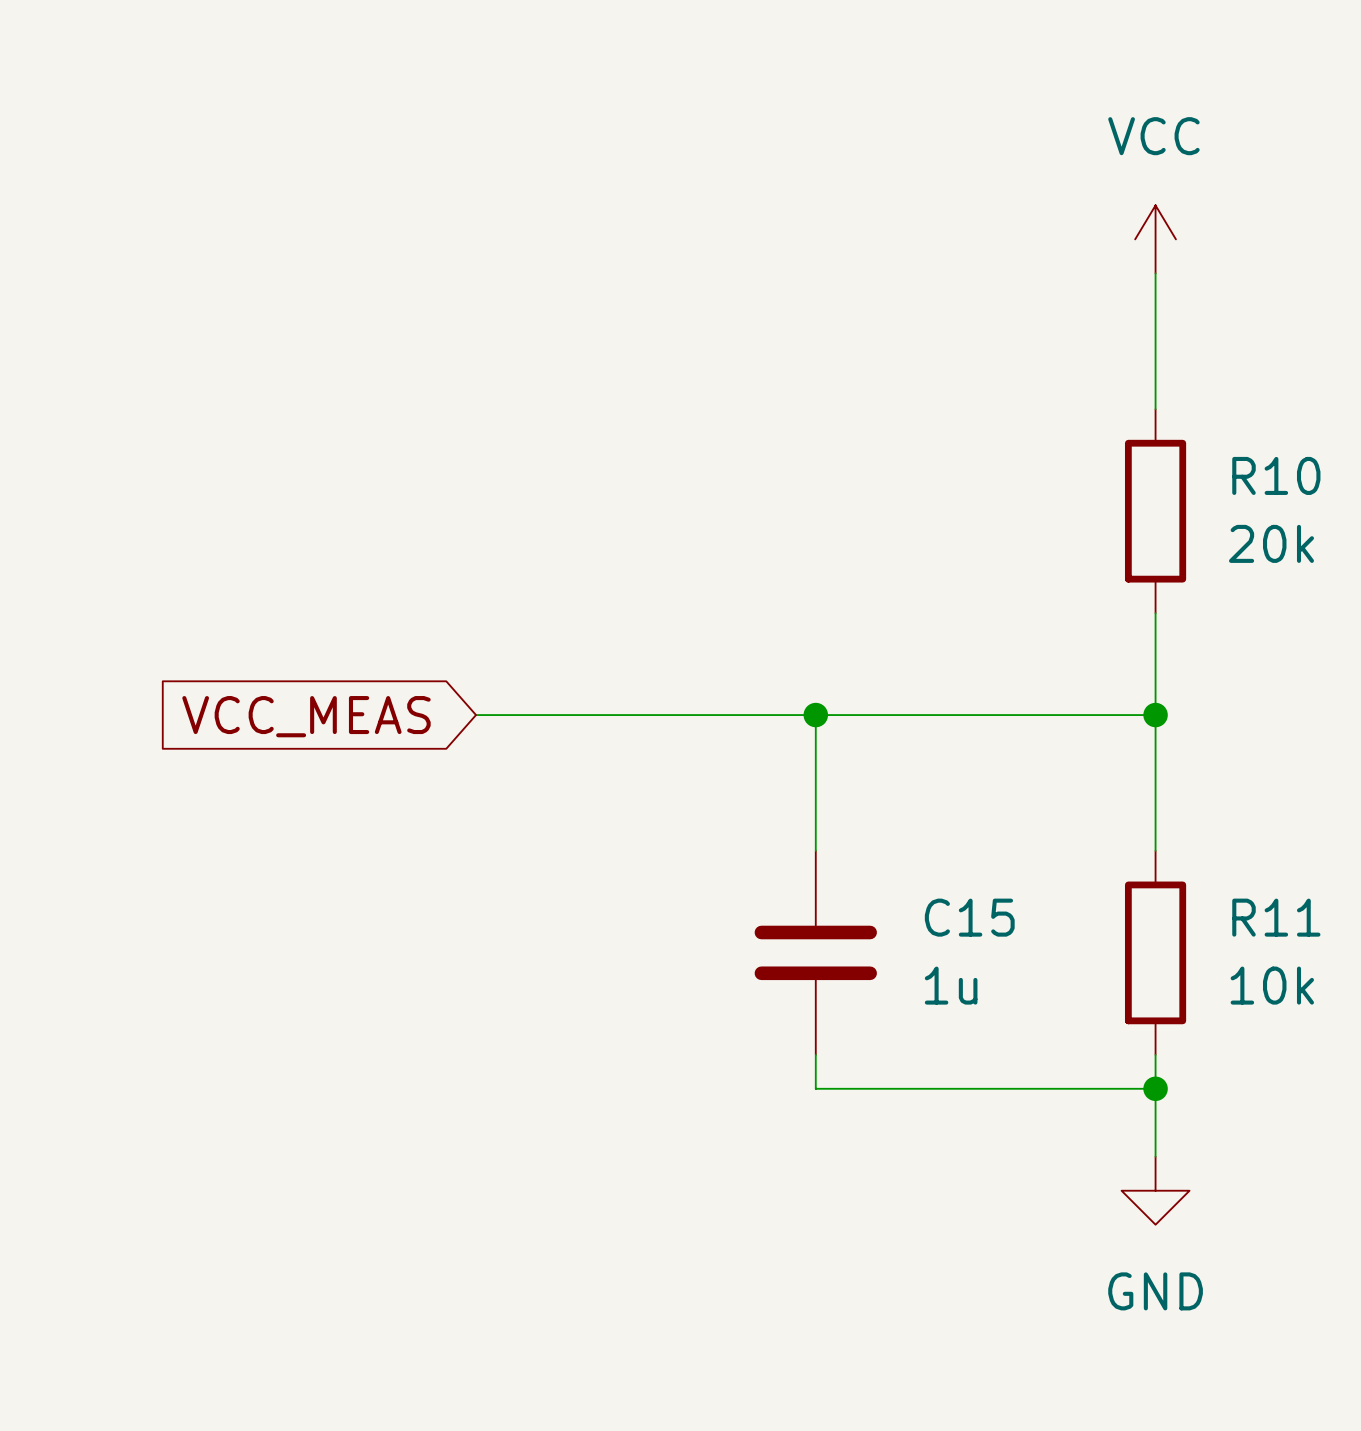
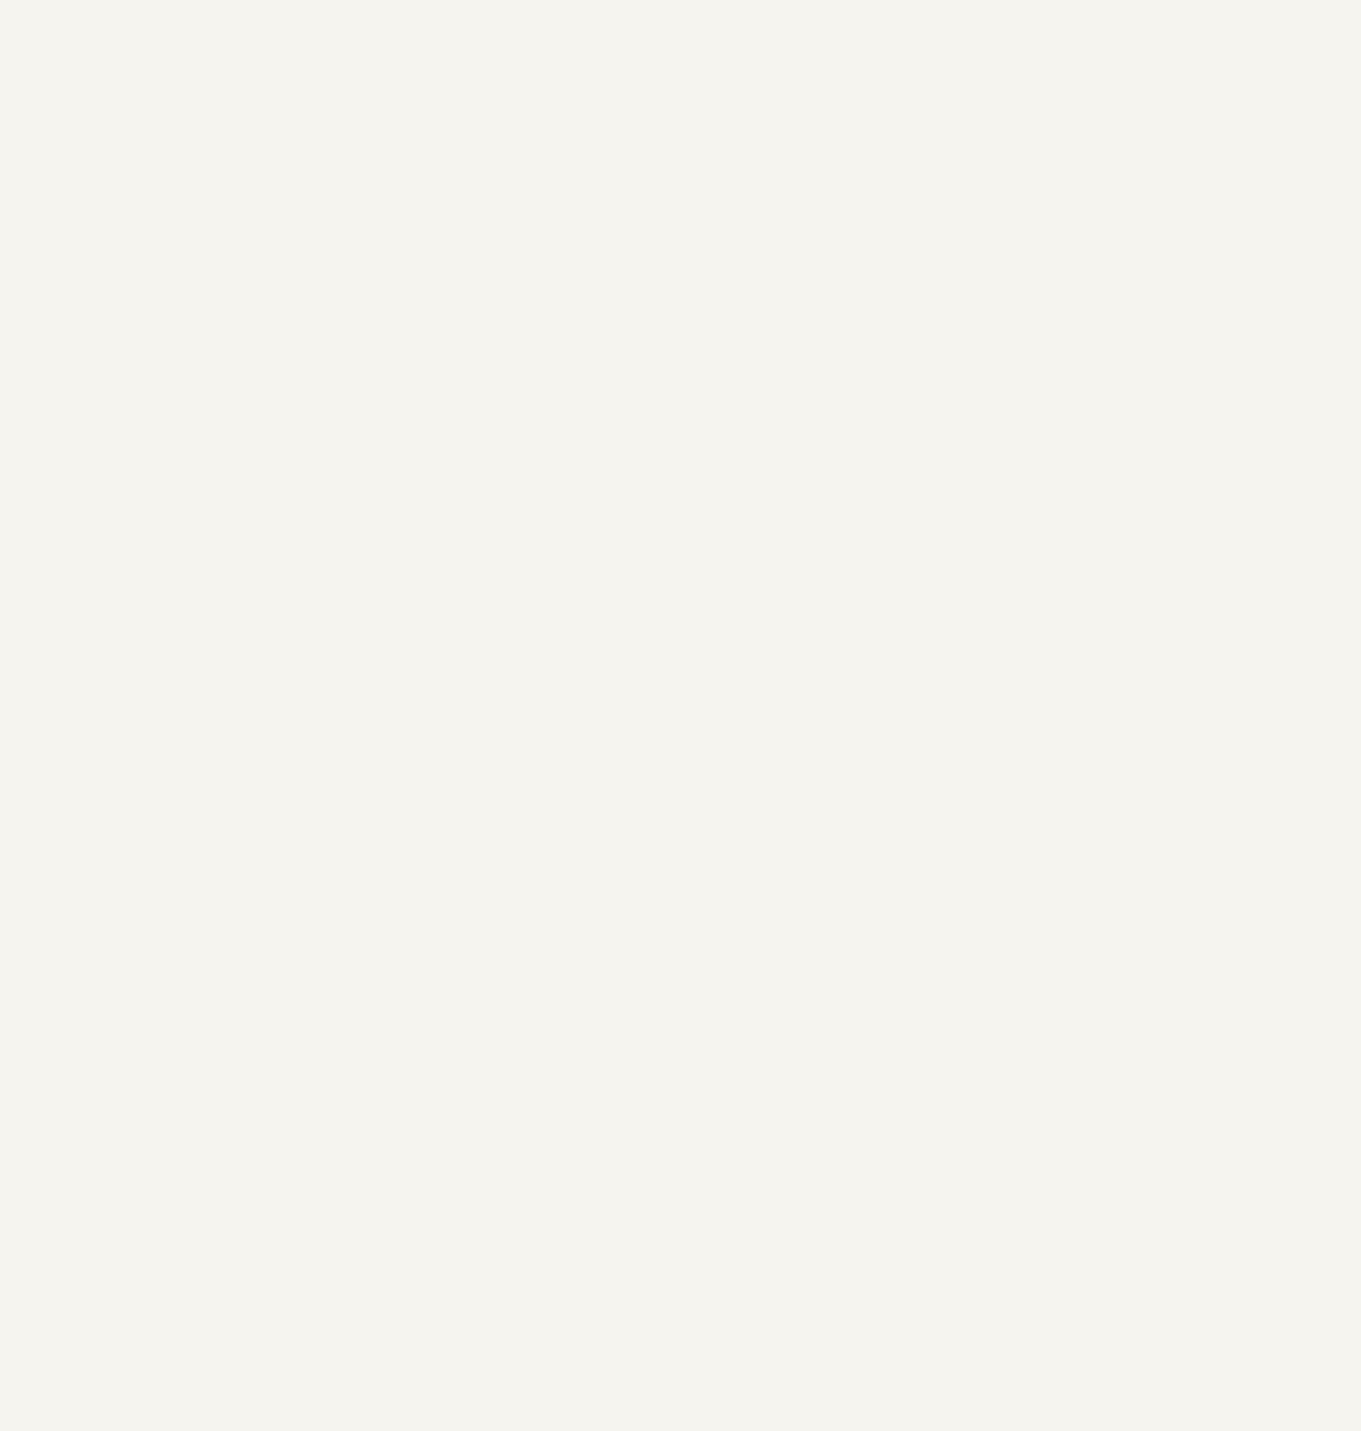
power symbol: VCC (1155, 239) -> none
wire: (1155, 273) (1155, 409) -> none
R10: 20k (1155, 511) -> none
wire: (1155, 613) (1155, 850) -> none
wire: (476, 715) (1155, 715) -> none
wire: (815, 715) (815, 850) -> none
junction: (815, 715) -> none
junction: (1155, 715) -> none
global label: VCC_MEAS (306, 716) -> none
C15: 1u (815, 952) -> none
R11: 10k (1155, 952) -> none
wire: (815, 1054) (815, 1088) (1155, 1088) -> none
wire: (1155, 1054) (1155, 1156) -> none
junction: (1155, 1088) -> none
power symbol: GND (1155, 1190) -> none

